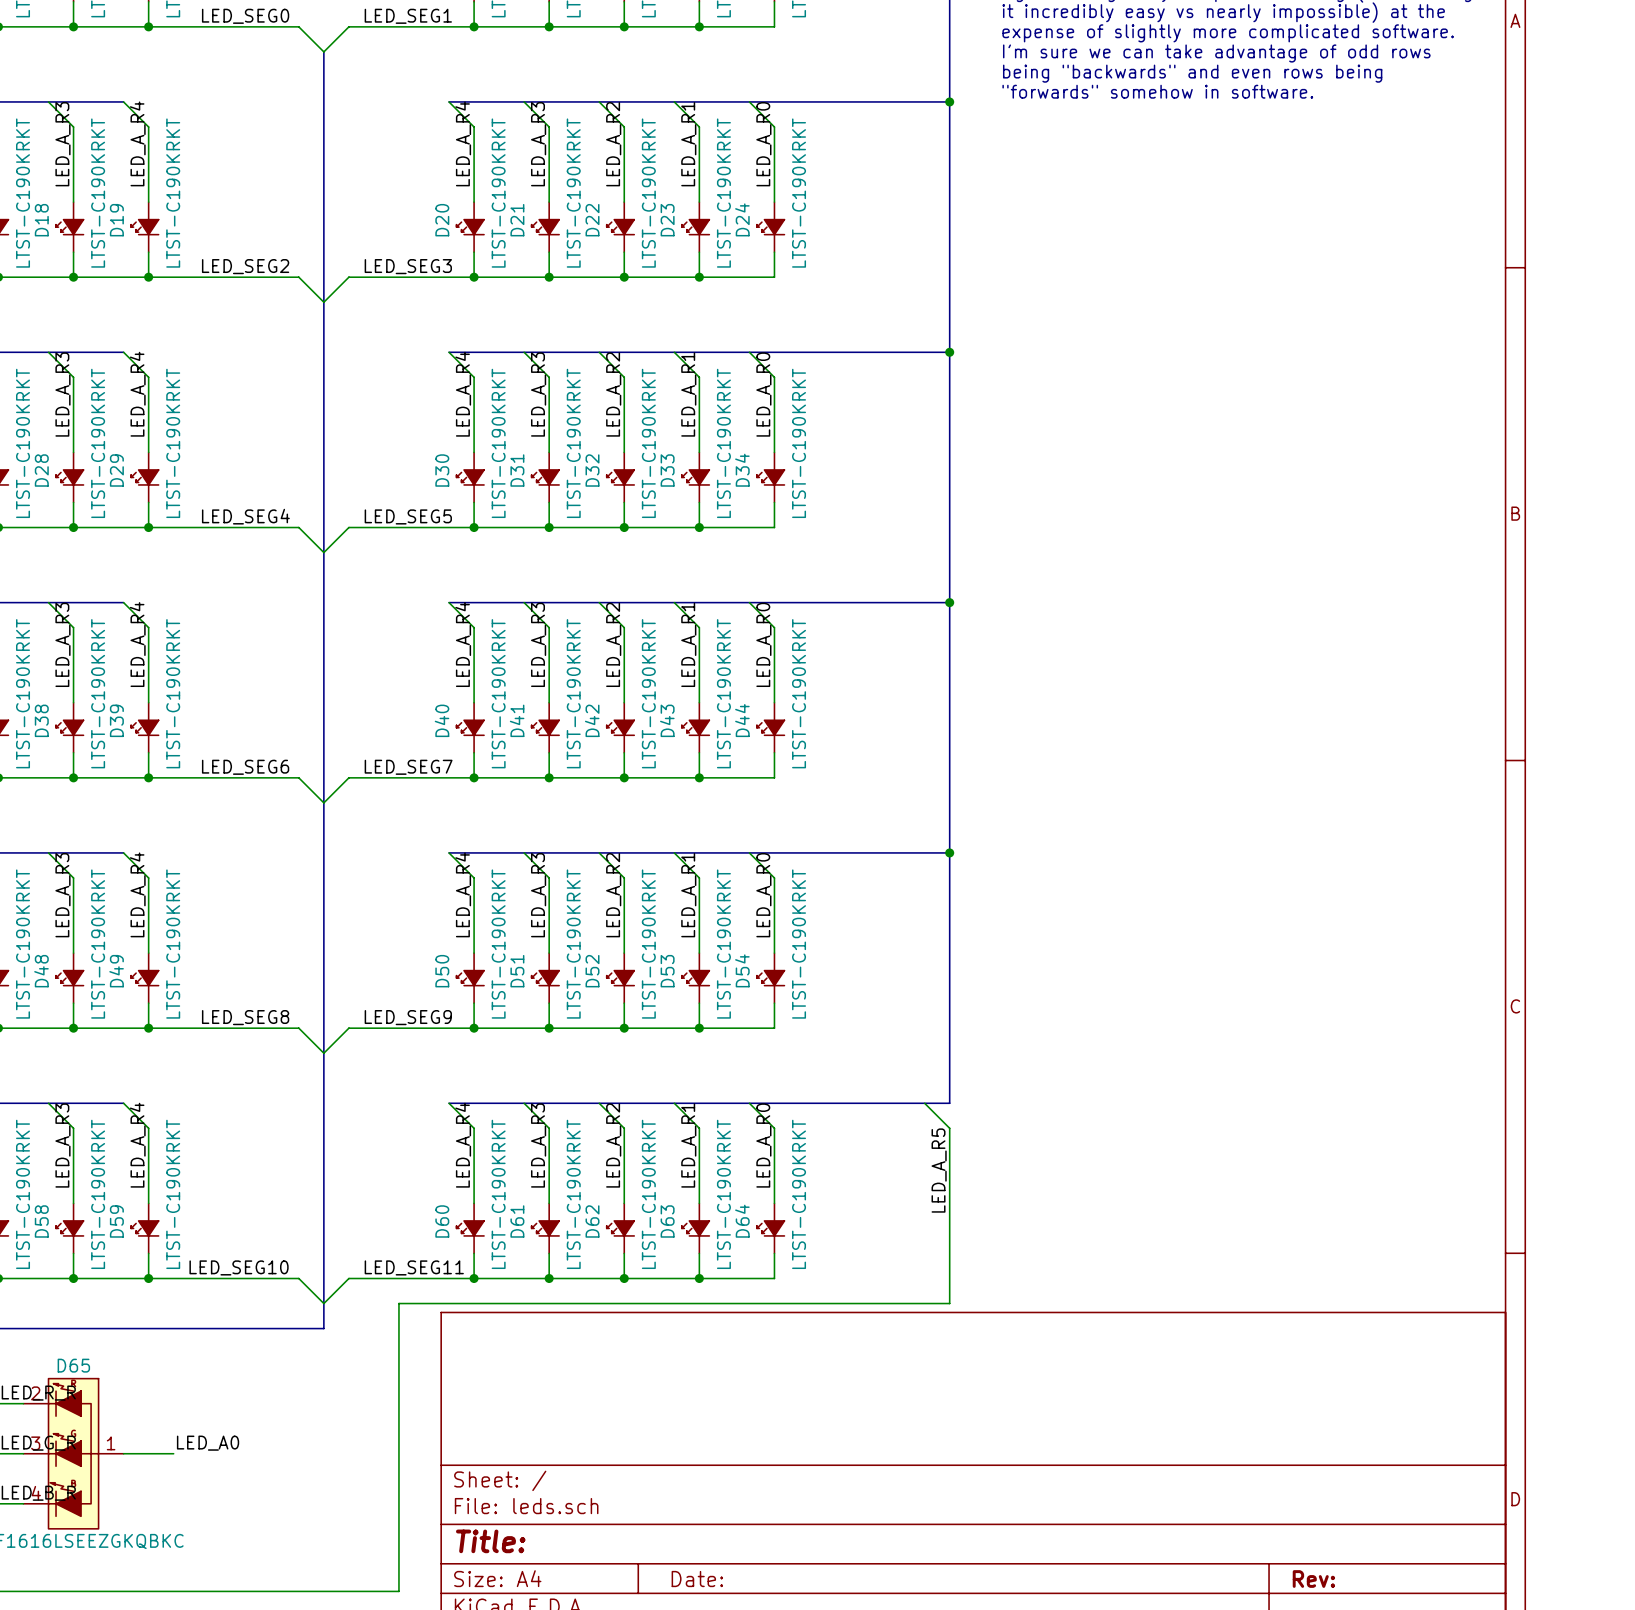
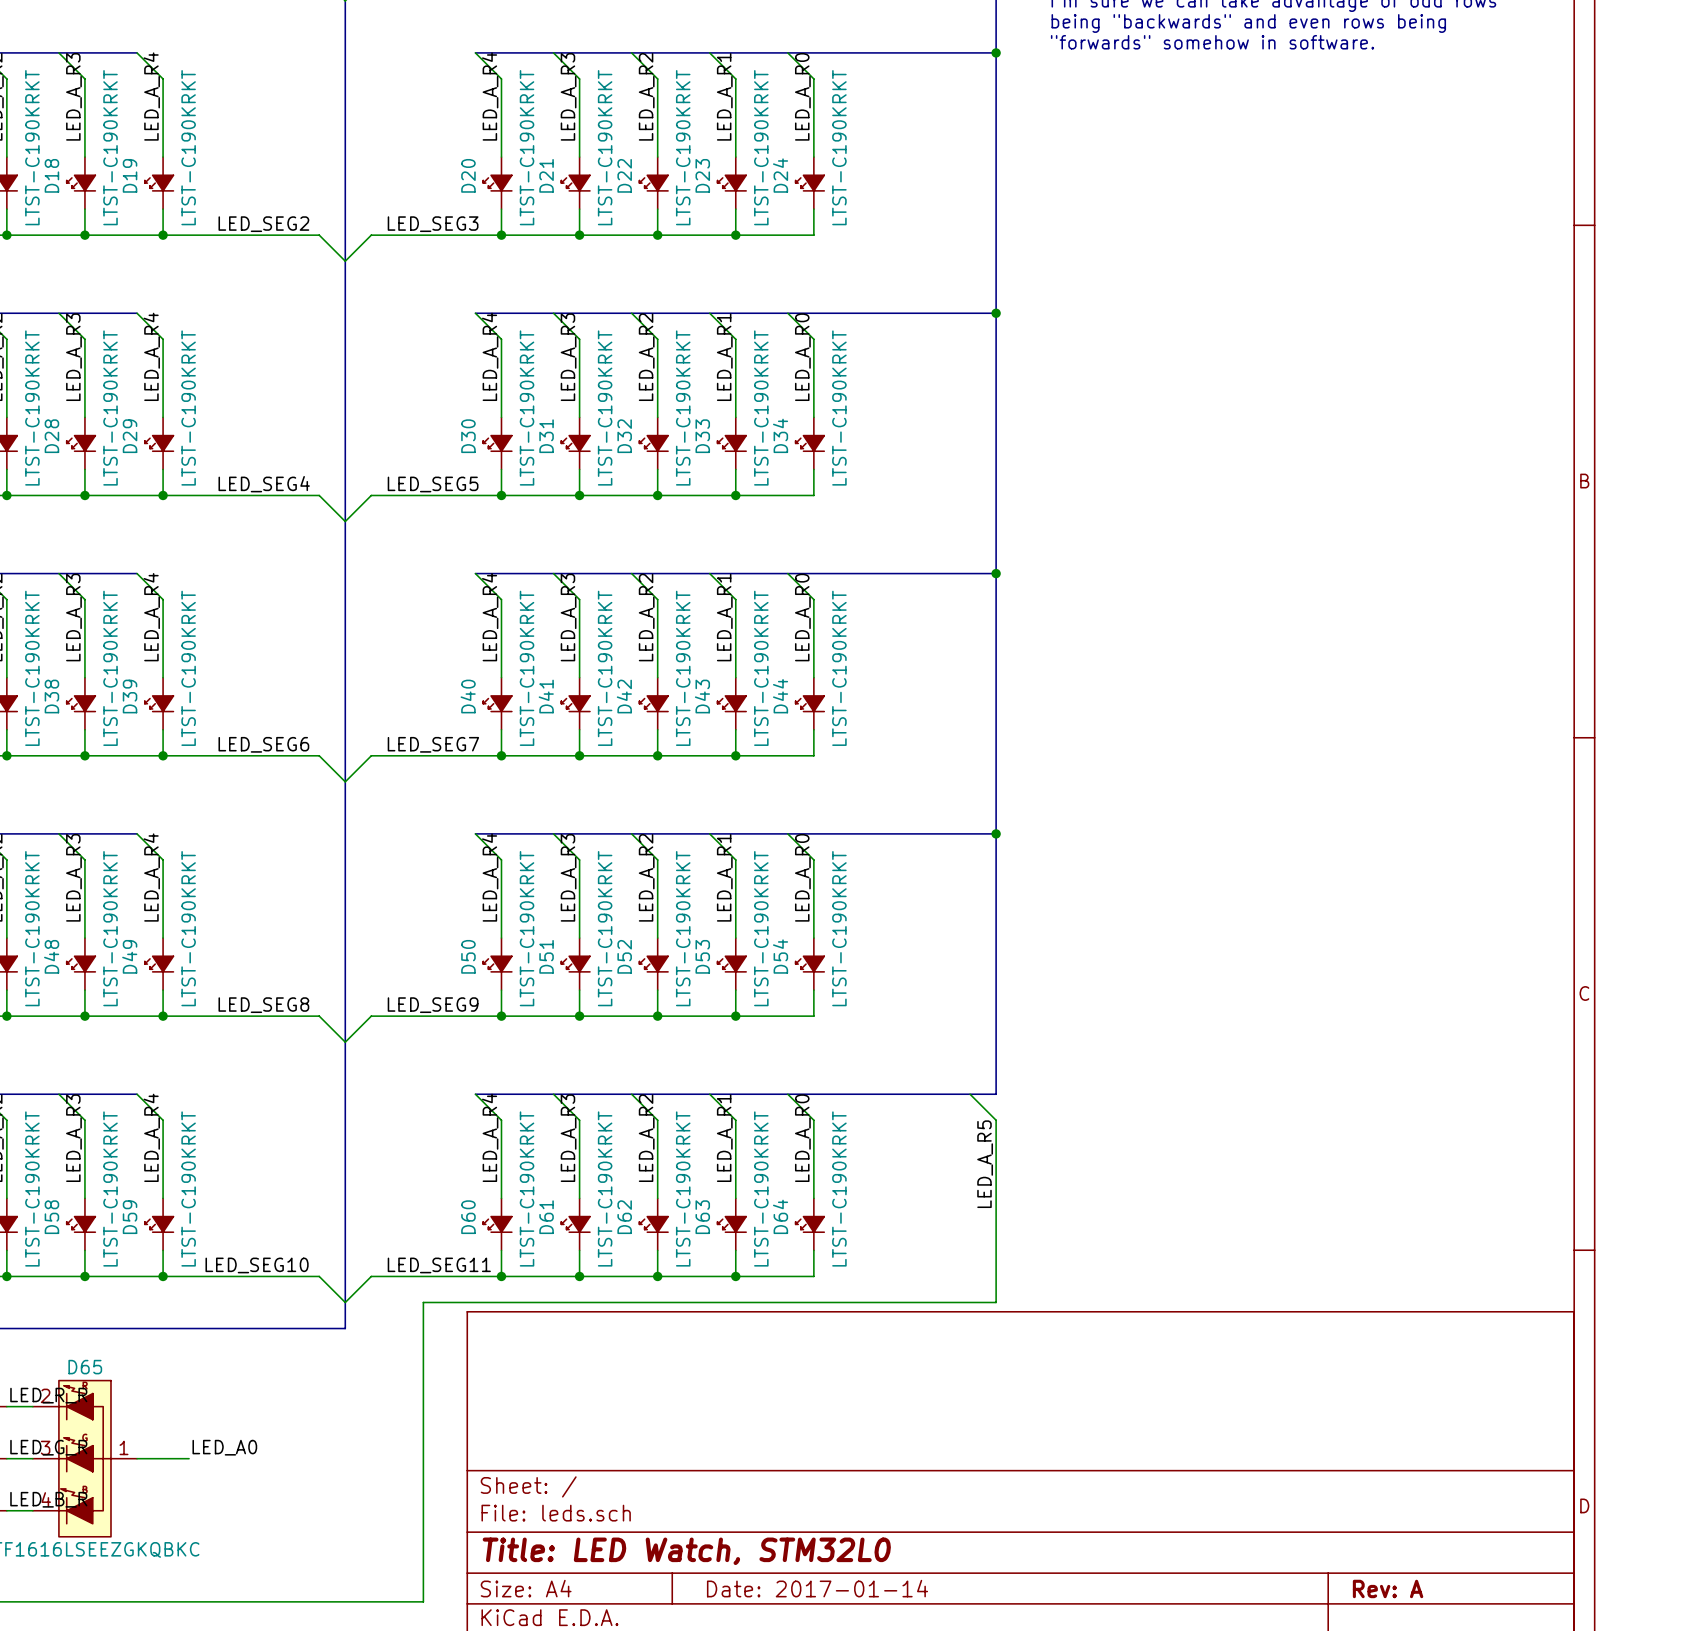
title block: Title: (490, 1541) -> Title: LED Watch, STM32L0 (686, 1551)
title block: Date: (697, 1579) -> Date: 2017-01-14 (817, 1588)
title block: Rev: (1313, 1579) -> Rev: A (1388, 1588)

